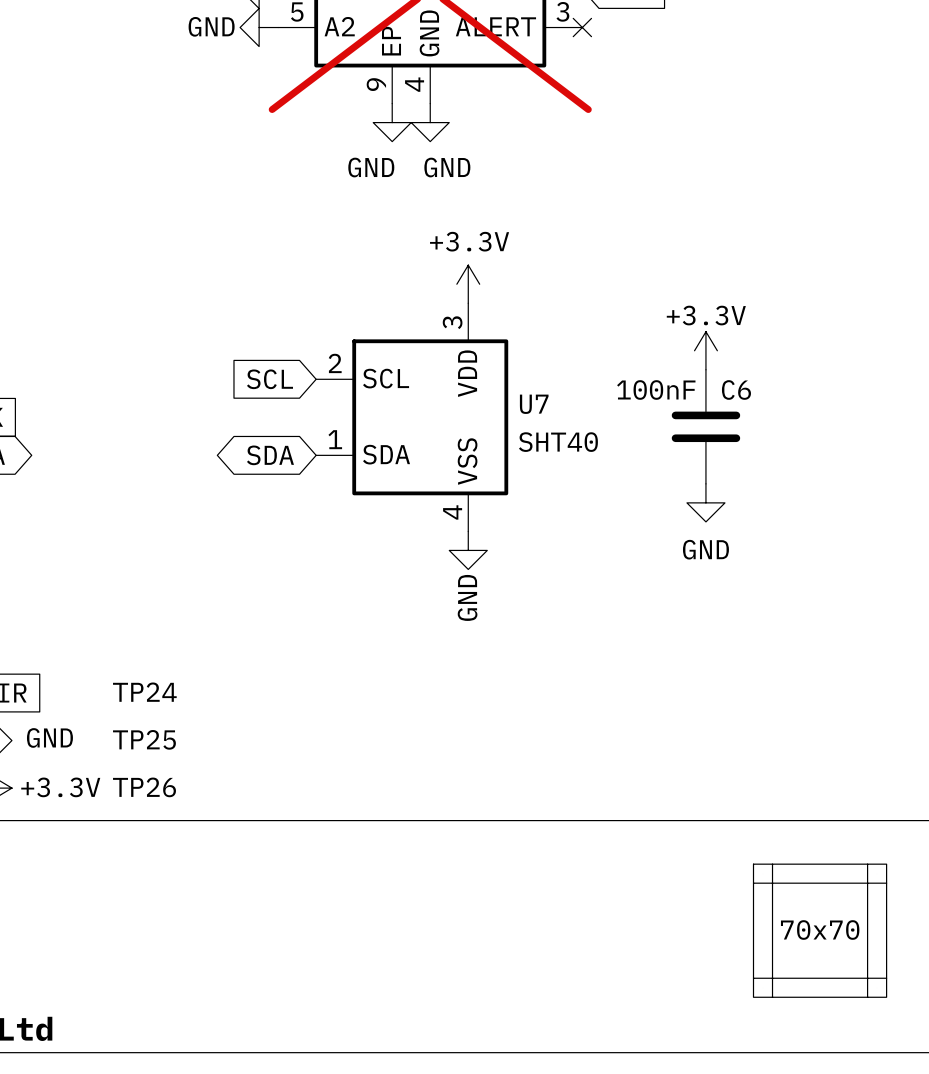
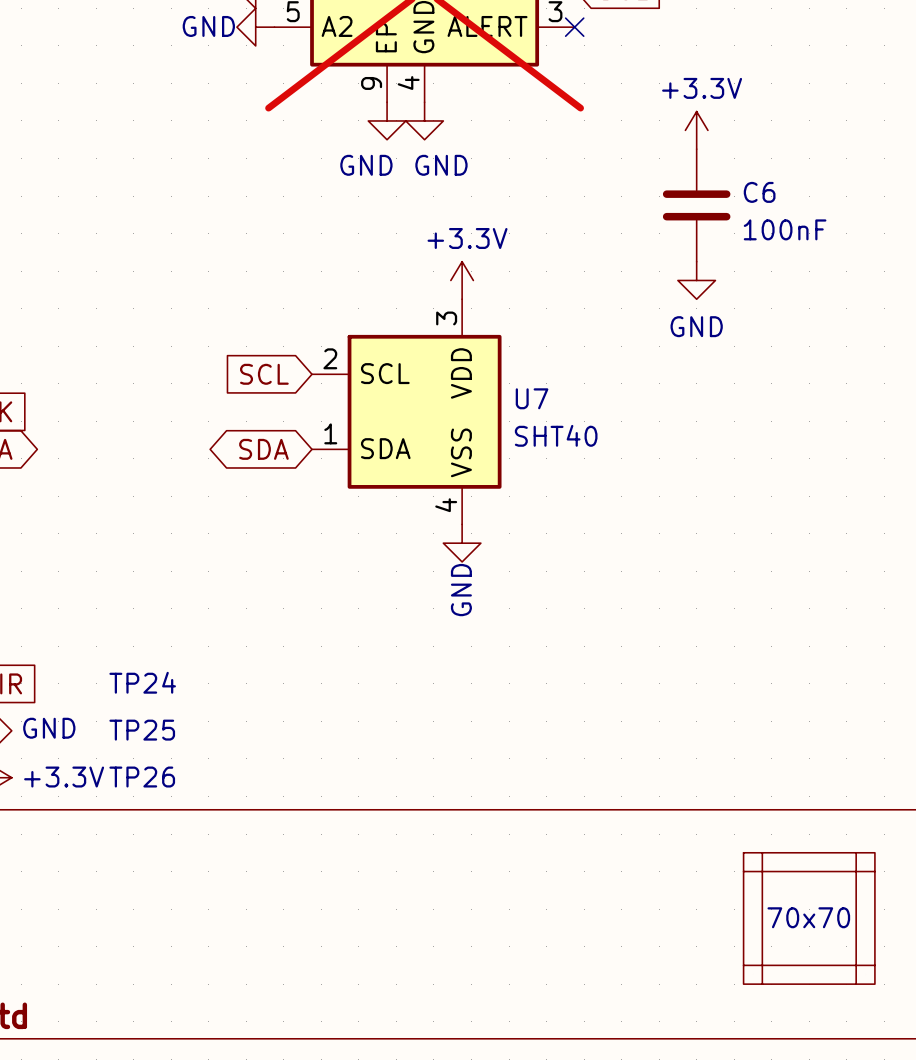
power symbol text position: +3.3V (706, 315) -> +3.3V (702, 88)
power symbol position: +3.3V (705, 350) -> +3.3V (696, 130)
C6 value position: 100nF (656, 389) -> 100nF (785, 229)
C6 name position: C6 (736, 389) -> C6 (759, 192)
C6 position: (705, 426) -> (696, 205)
power symbol position: GND (705, 502) -> GND (696, 280)

